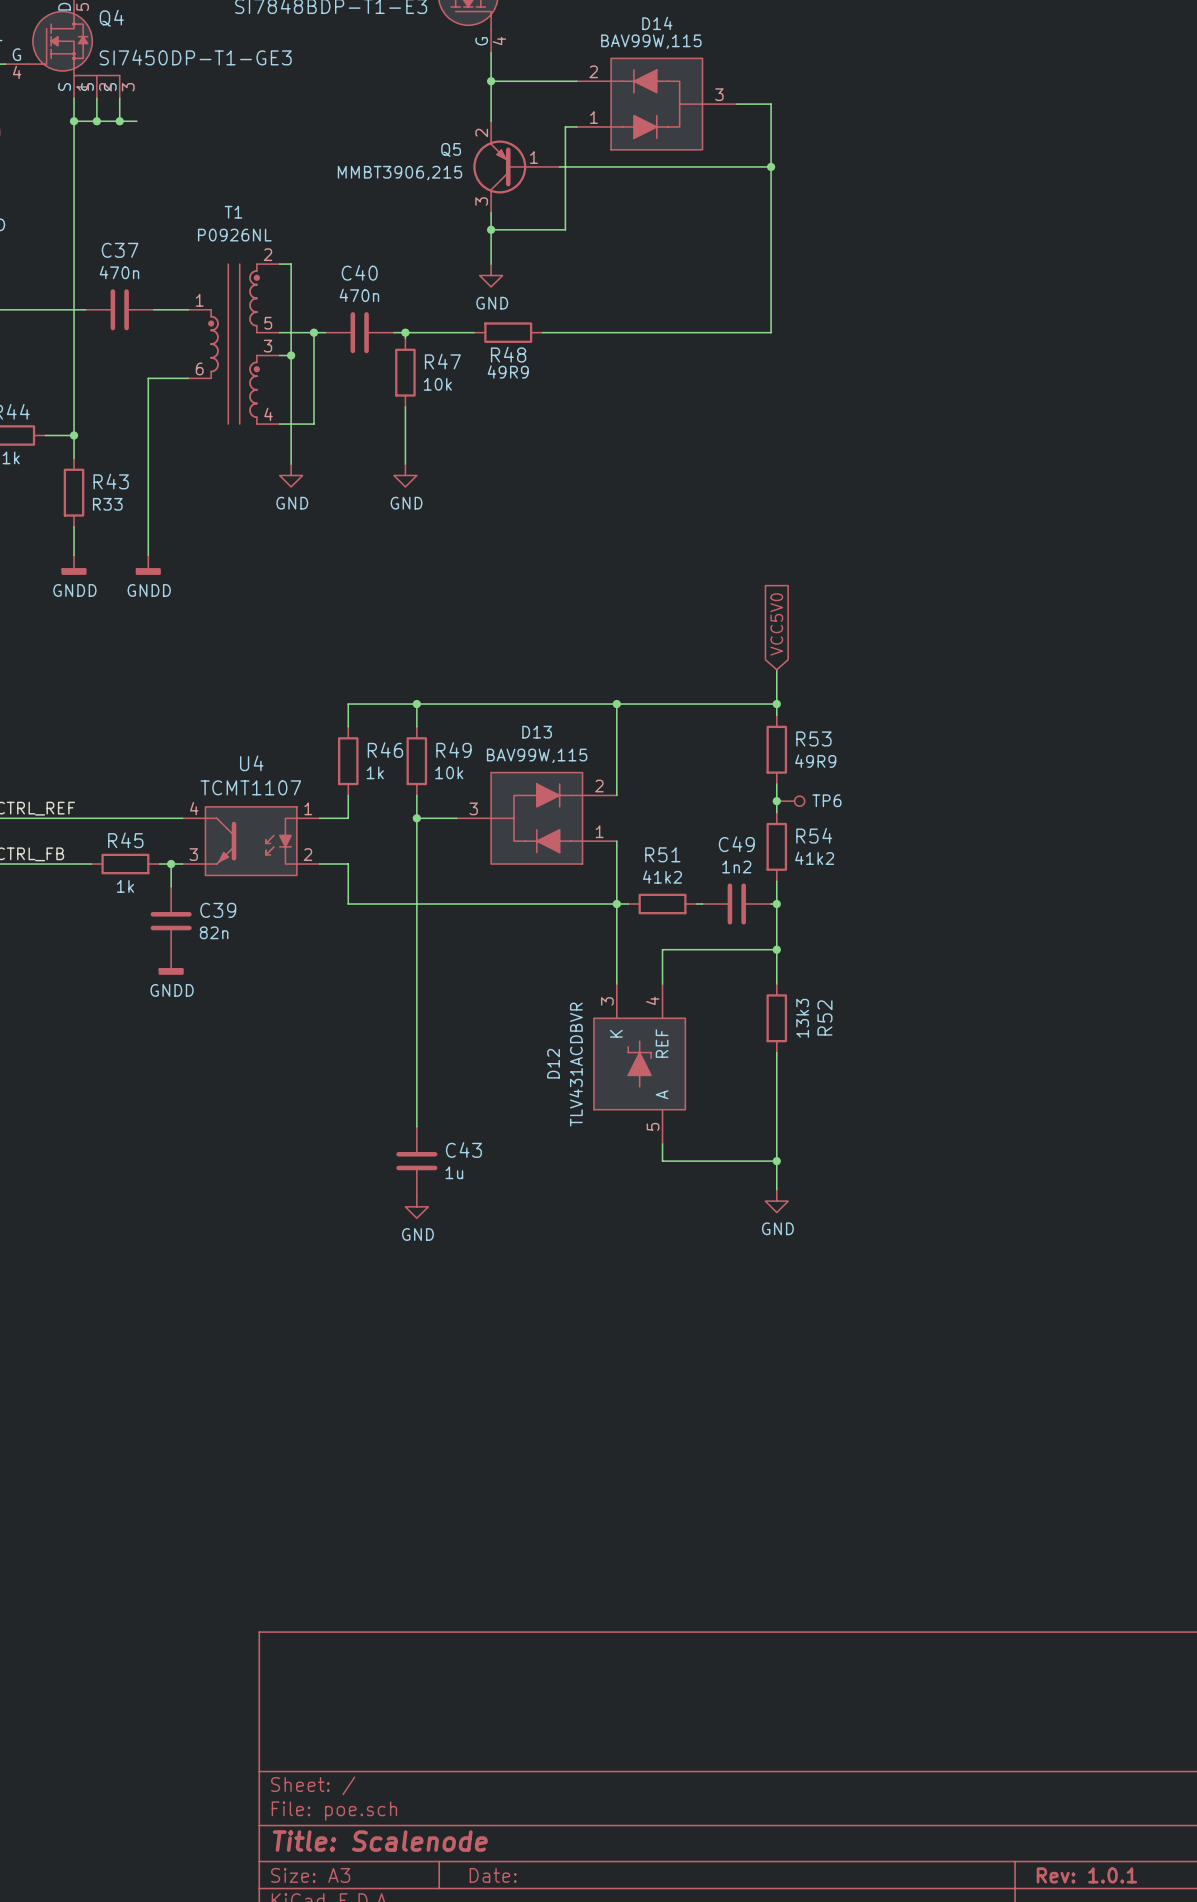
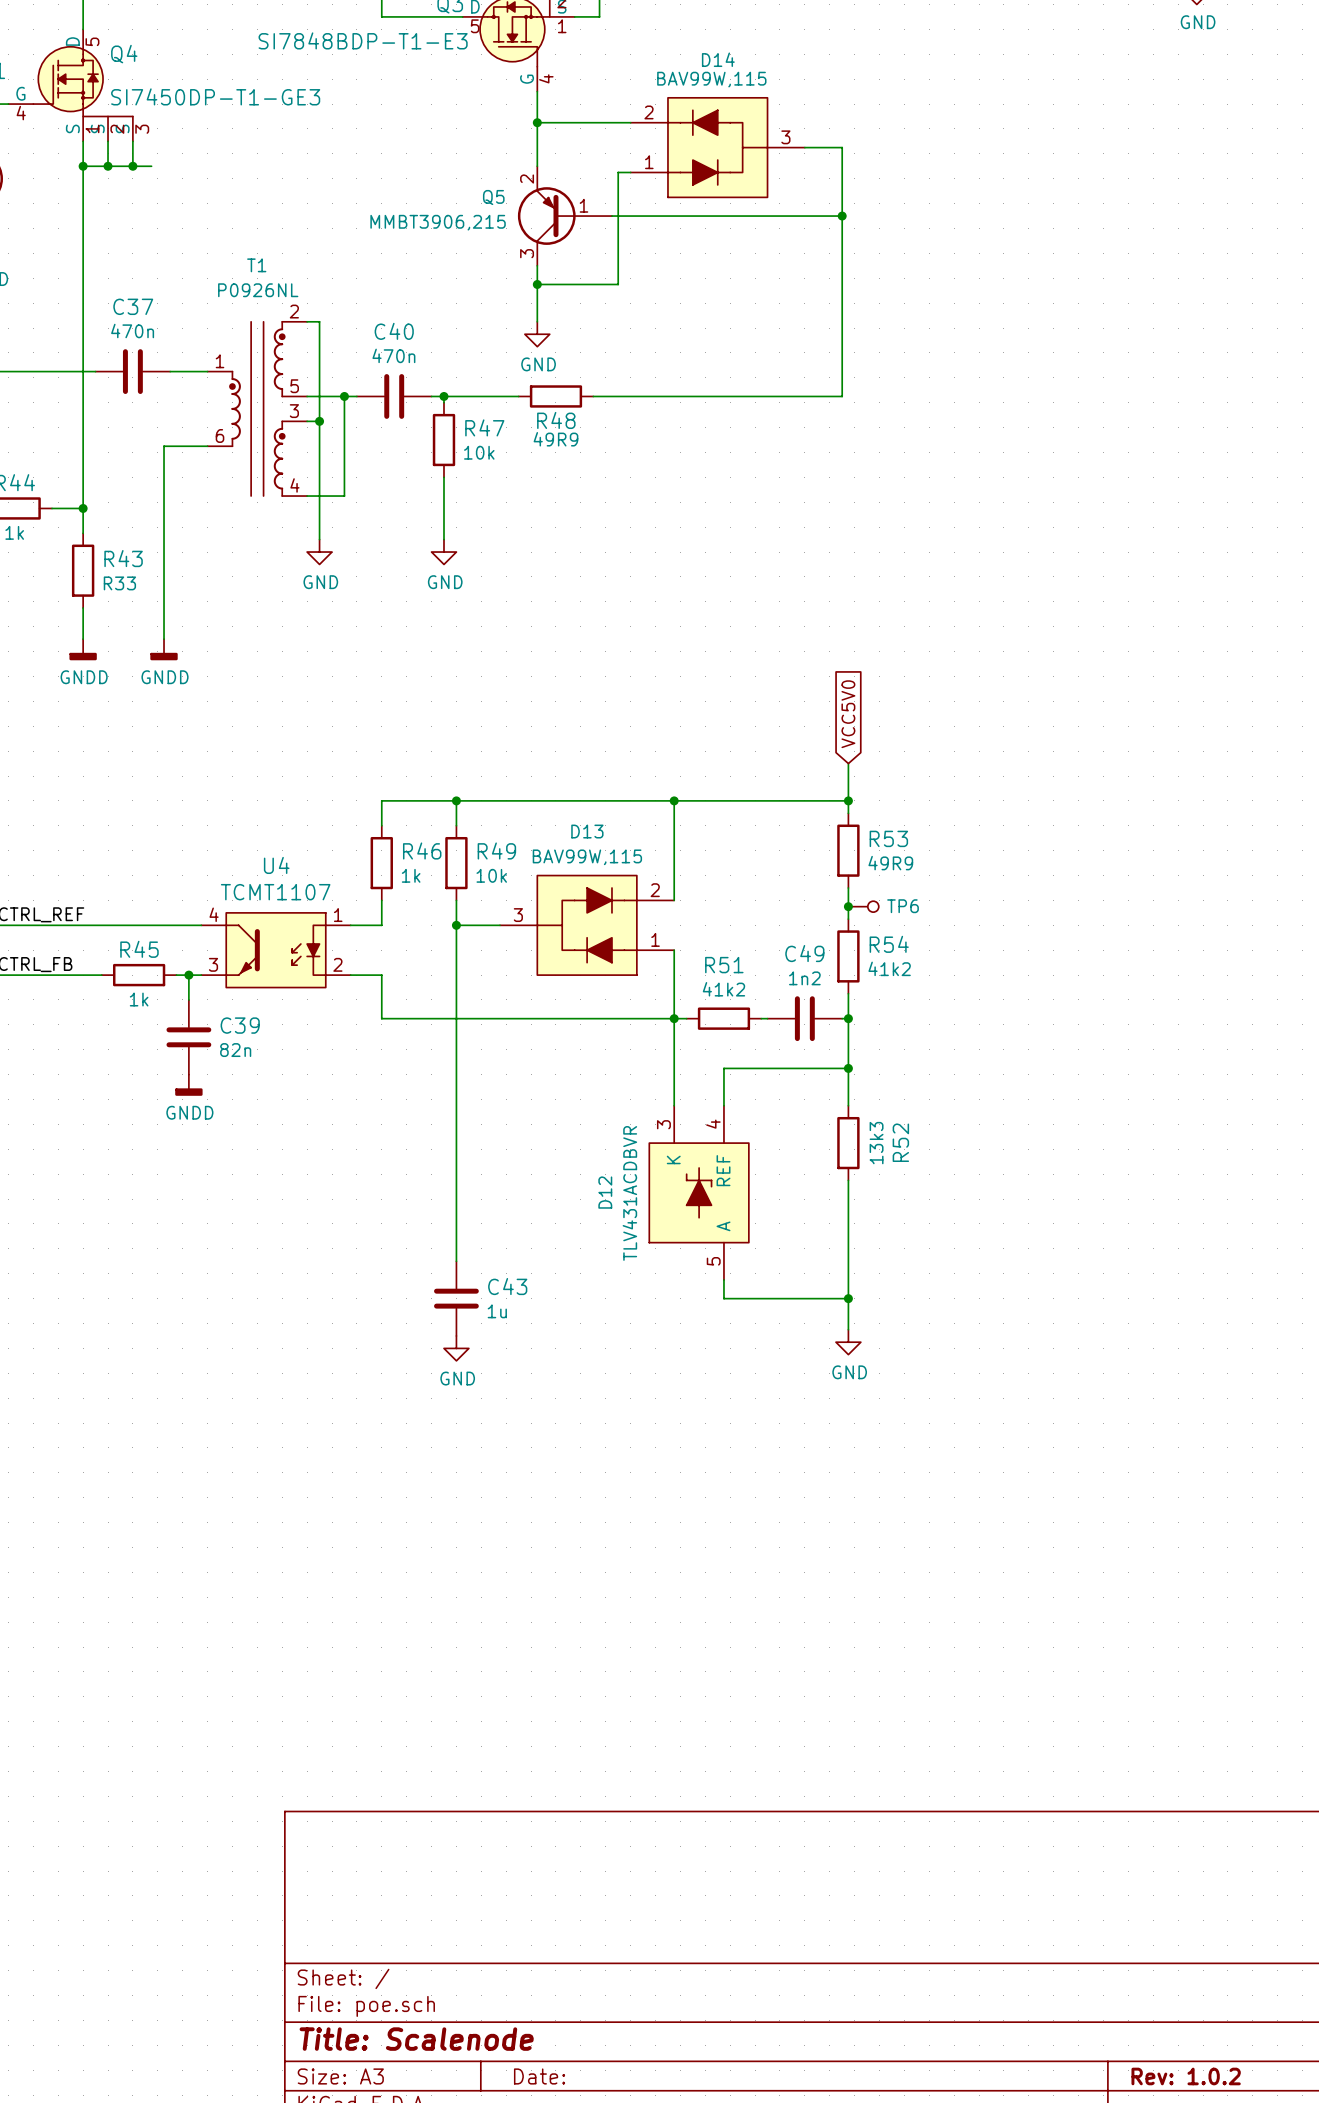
title block: Rev: 1.0.1 (1086, 1875) -> Rev: 1.0.2 (1186, 2076)

